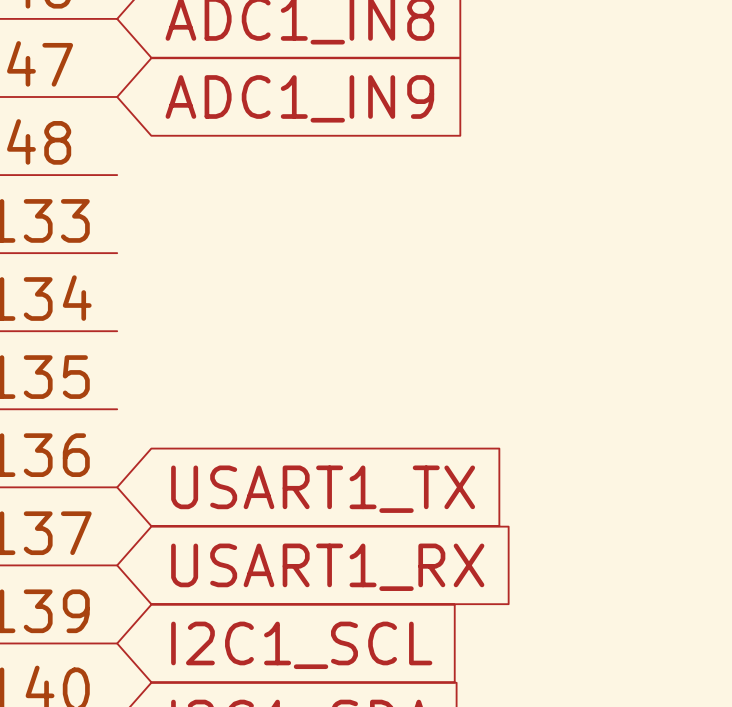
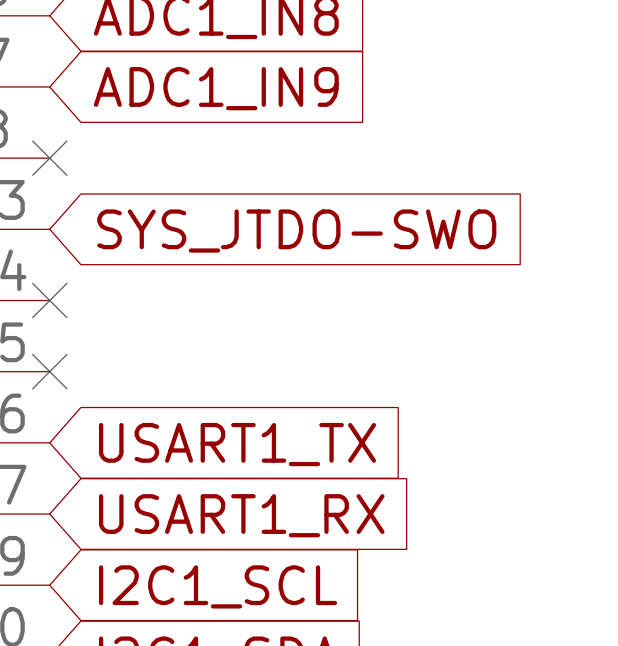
no-connect mark: none -> (49, 158)
global label: none -> SYS_JTDO-SWO (296, 231)
no-connect mark: none -> (49, 300)
no-connect mark: none -> (49, 371)

